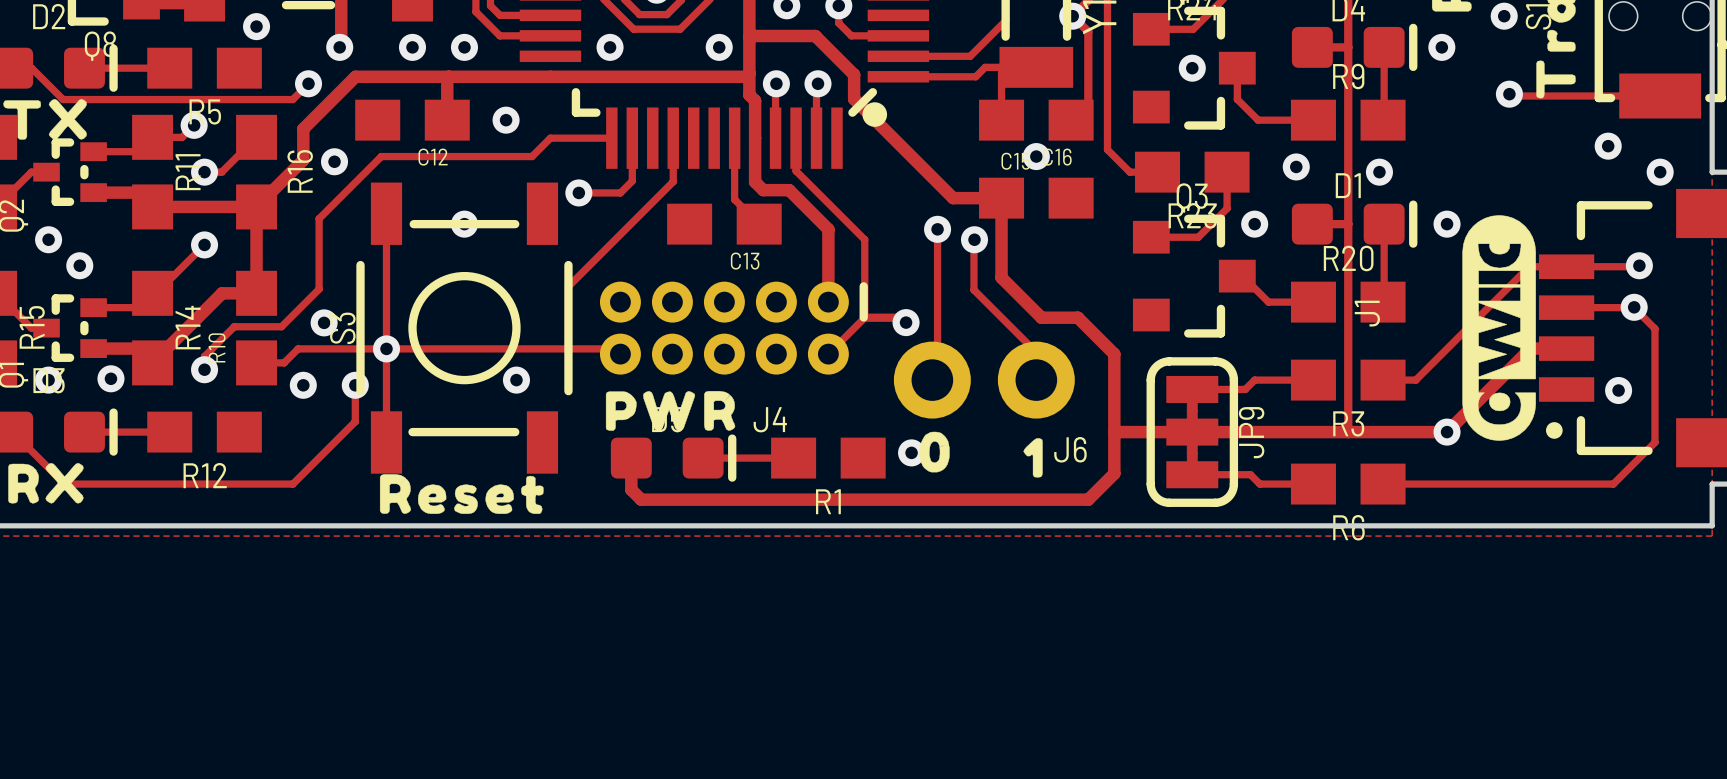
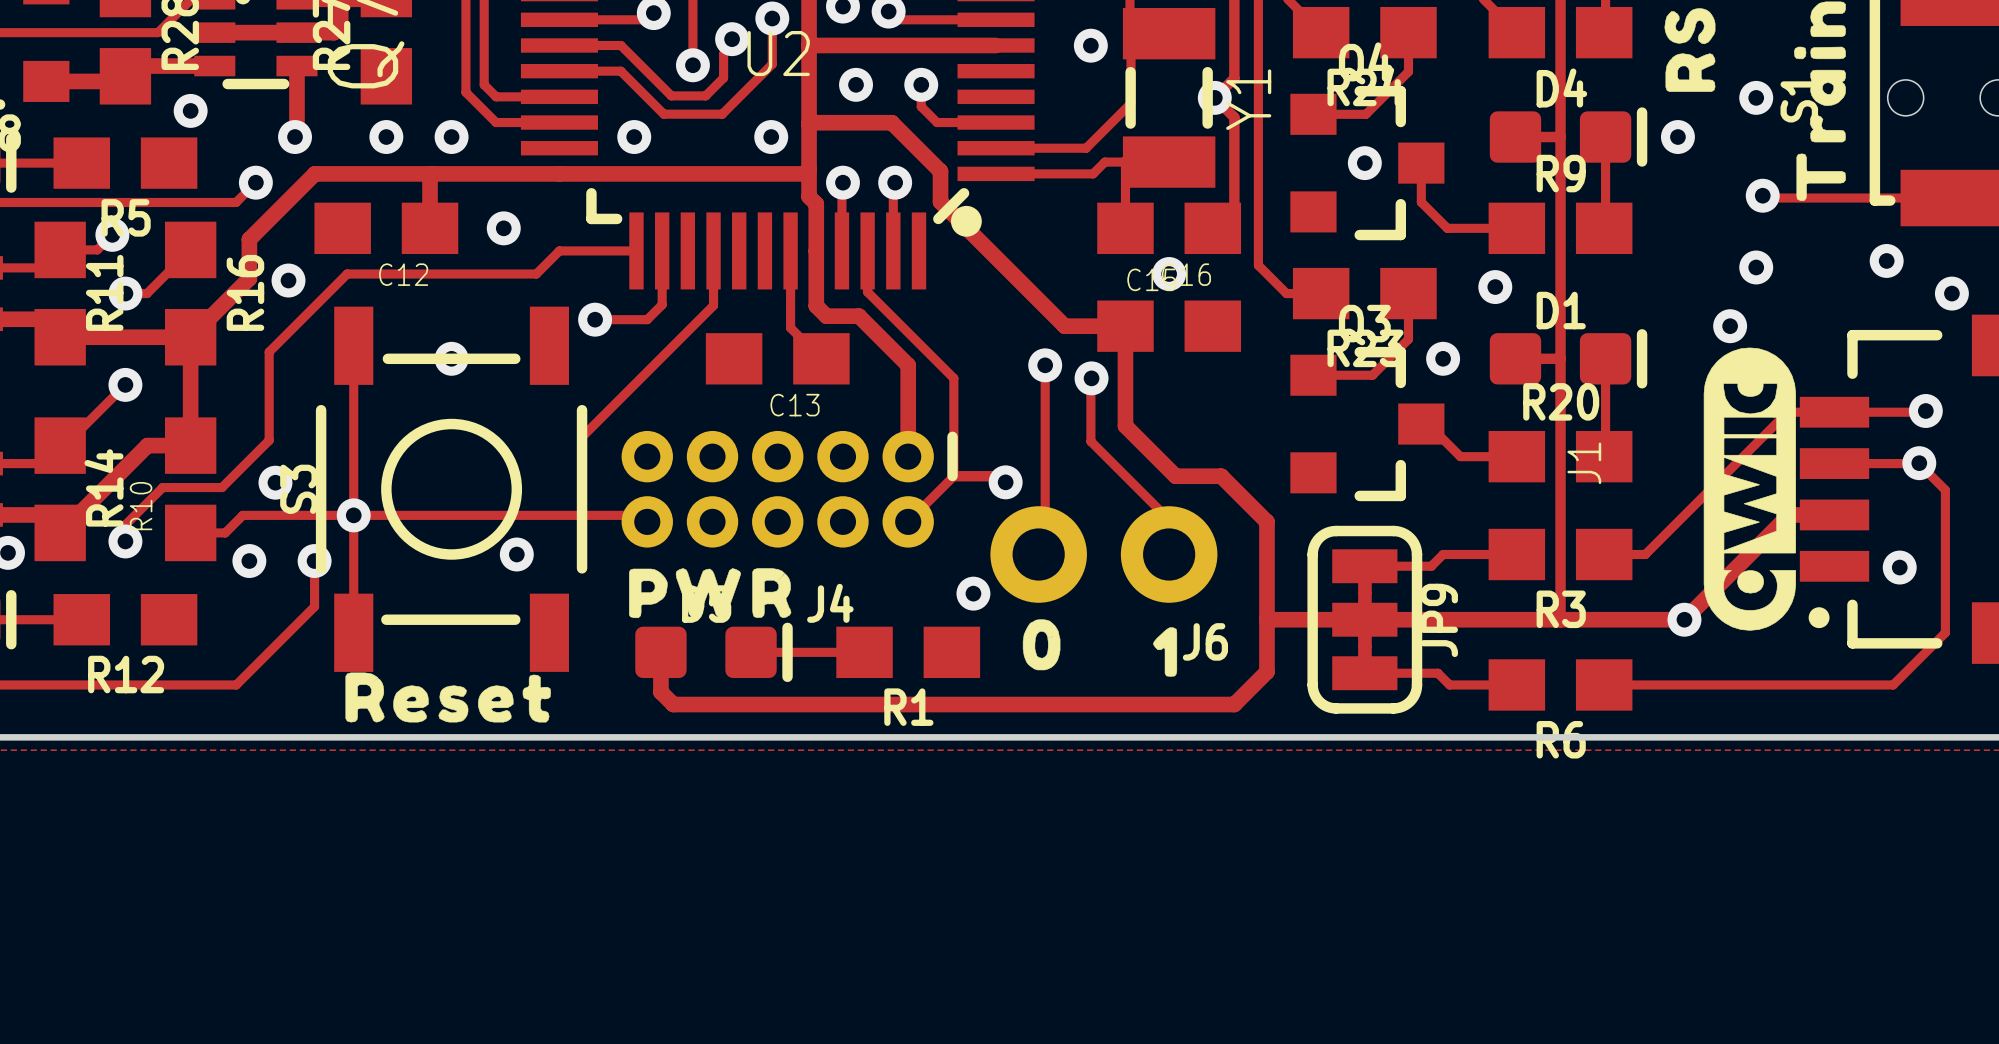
via: none -> (1756, 267)
via: (1379, 172) -> none
via position: (1447, 224) -> (1730, 326)
via position: (911, 452) -> (973, 593)

